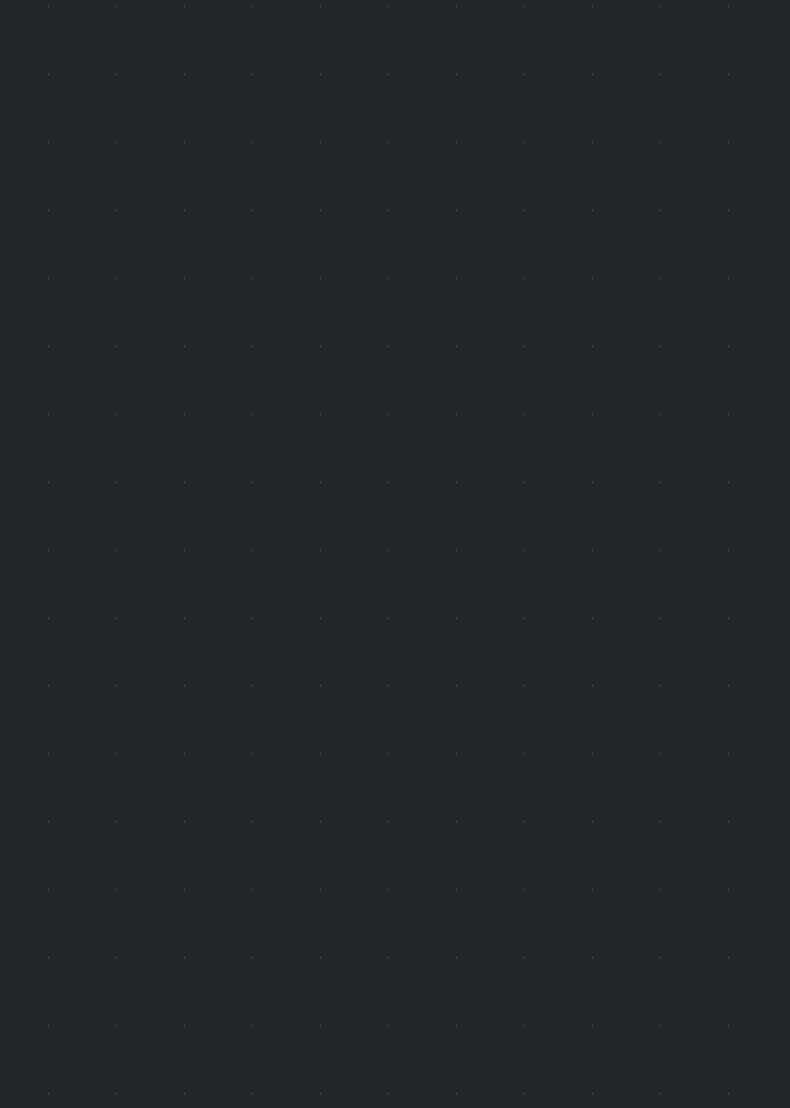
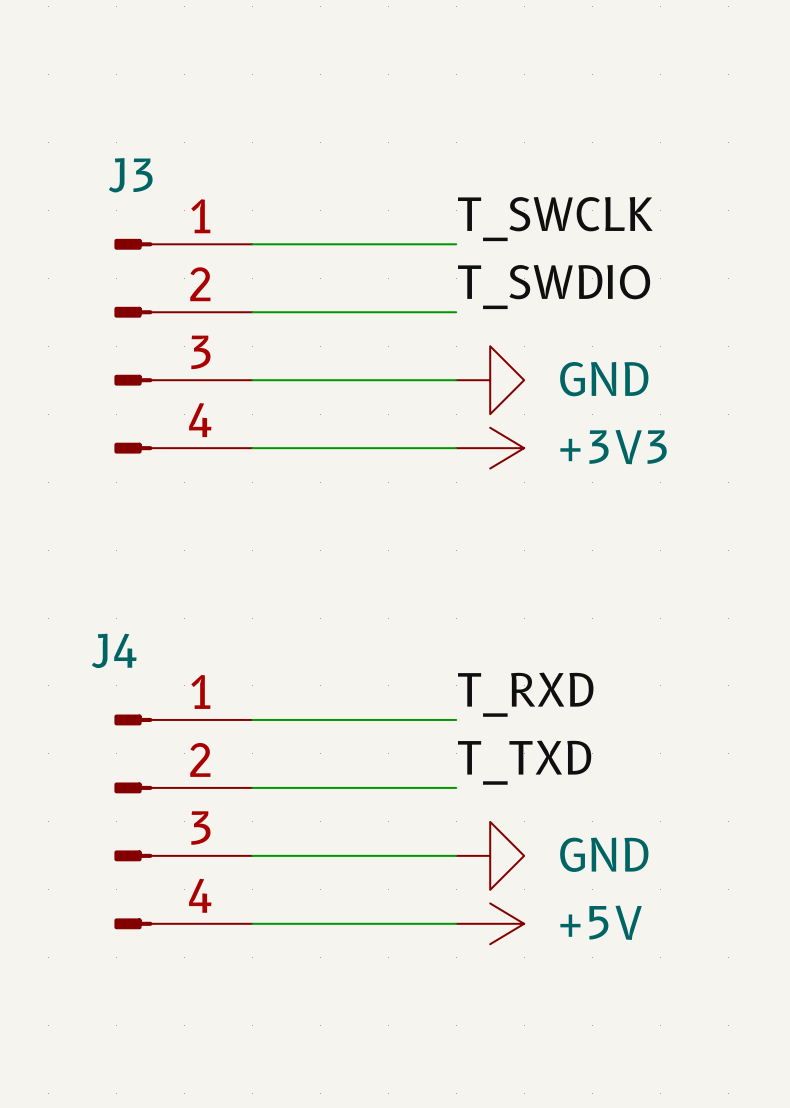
label: none -> T_SWCLK (555, 219)
wire: none -> (252, 244) (456, 244)
label: none -> T_SWDIO (554, 287)
wire: none -> (252, 312) (456, 312)
J3: none -> (183, 346)
wire: none -> (252, 380) (456, 380)
power symbol: none -> GND (490, 380)
wire: none -> (252, 448) (456, 448)
power symbol: none -> +3V3 (490, 448)
label: none -> T_RXD (525, 694)
wire: none -> (252, 719) (456, 719)
label: none -> T_TXD (524, 762)
wire: none -> (252, 787) (456, 787)
J4: none -> (183, 821)
wire: none -> (252, 855) (456, 855)
power symbol: none -> GND (490, 855)
wire: none -> (252, 923) (456, 923)
power symbol: none -> +5V (490, 923)

